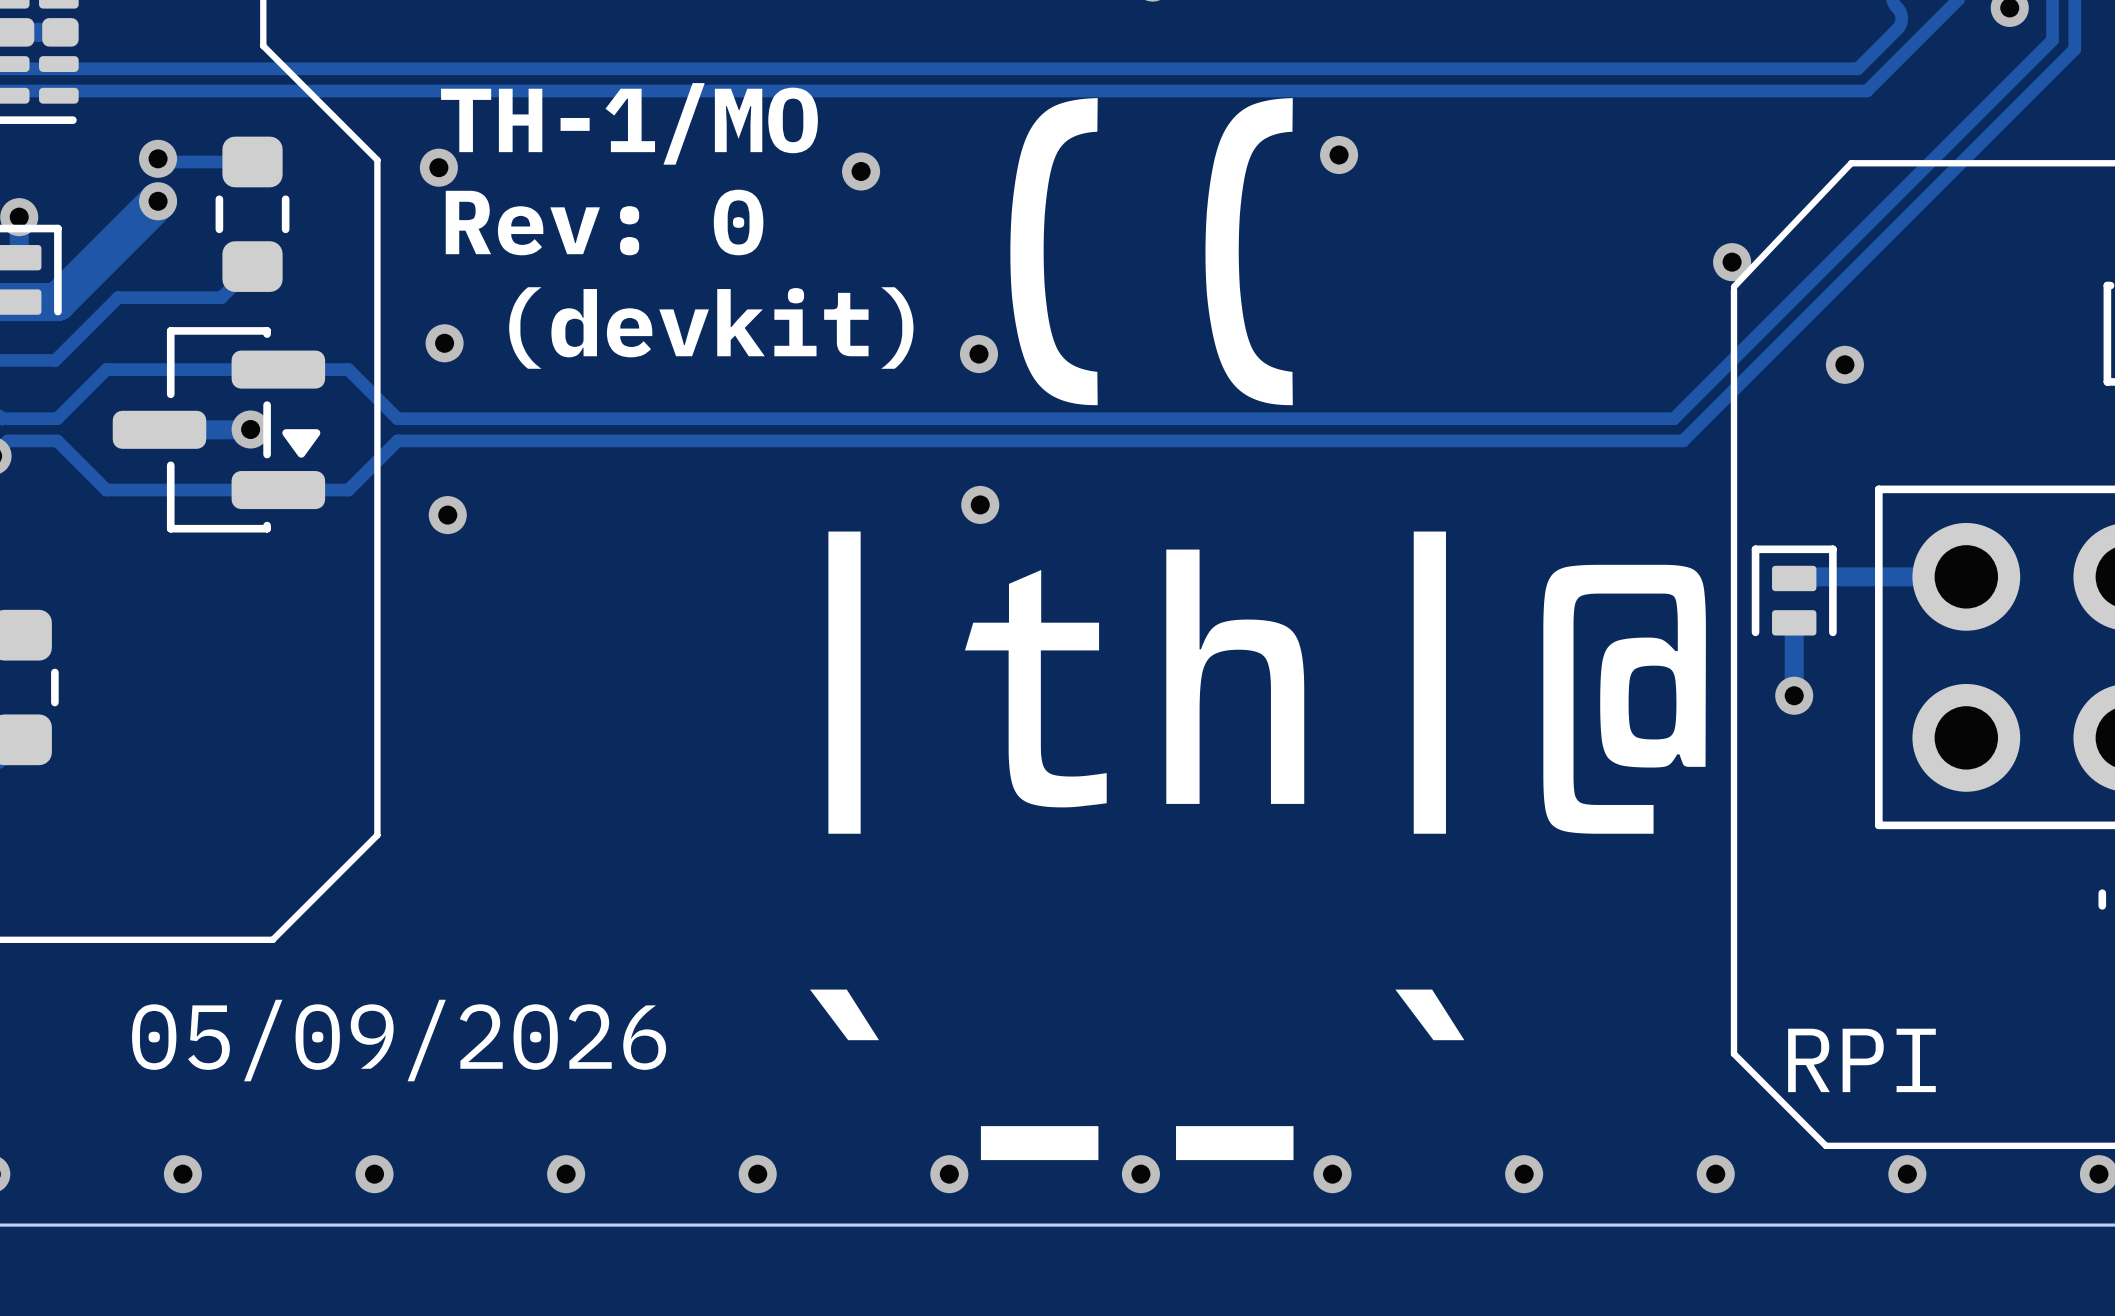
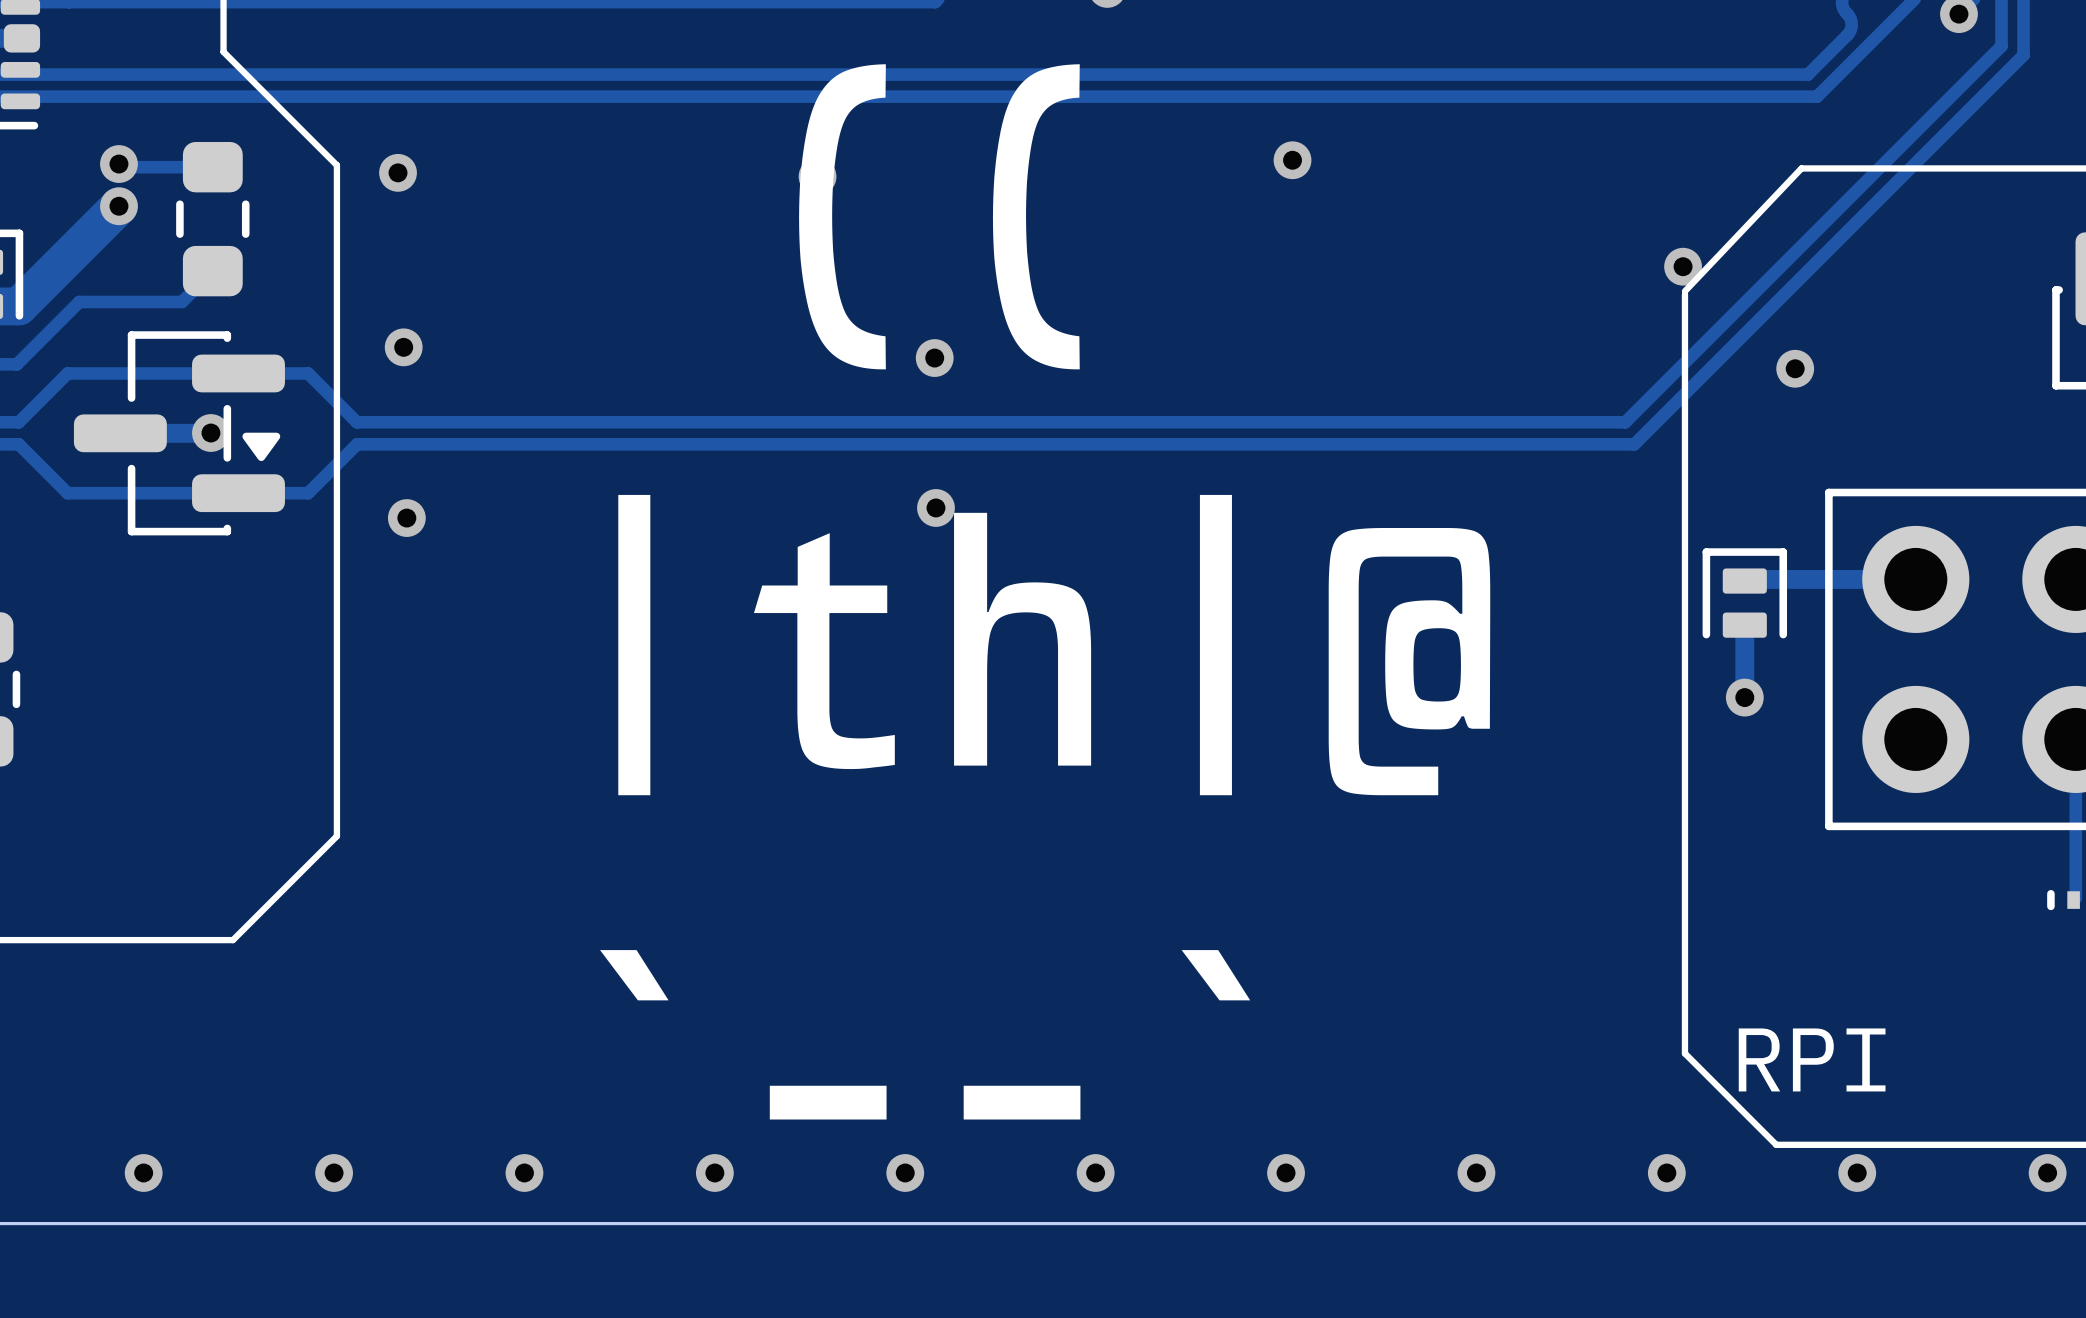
drawing: none -> [799, 64, 886, 370]
drawing: [1205, 98, 1293, 406] -> none
text: TH-1/MO (629, 123) -> none
text: Rev: 0 (604, 222) -> none
drawing position: (1054, 251) -> (1036, 216)
text: (devkit) (711, 328) -> none
drawing position: (1235, 676) -> (1022, 639)
drawing position: (844, 682) -> (634, 645)
drawing position: (1429, 682) -> (1215, 645)
drawing position: (1035, 688) -> (824, 651)
drawing position: (1624, 699) -> (1409, 661)
drawing position: (844, 1014) -> (634, 975)
drawing position: (1429, 1014) -> (1215, 975)
text: 05/09/2026 (399, 1040) -> none
drawing: none -> [769, 1085, 887, 1120]
drawing: [1176, 1126, 1294, 1161] -> none
drawing position: (1039, 1143) -> (1022, 1102)

